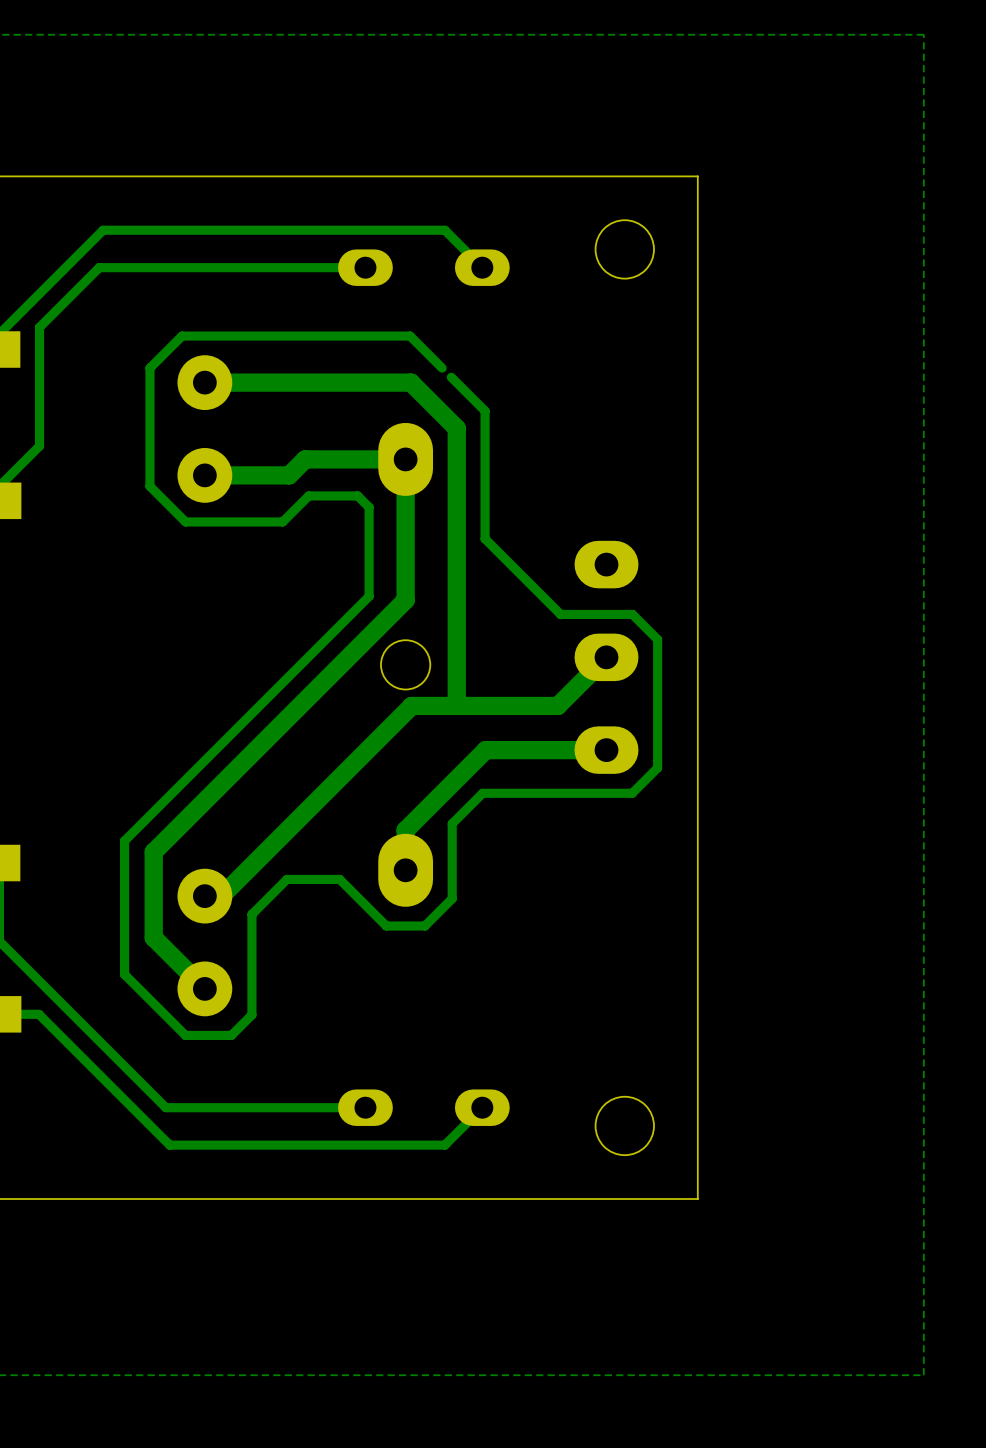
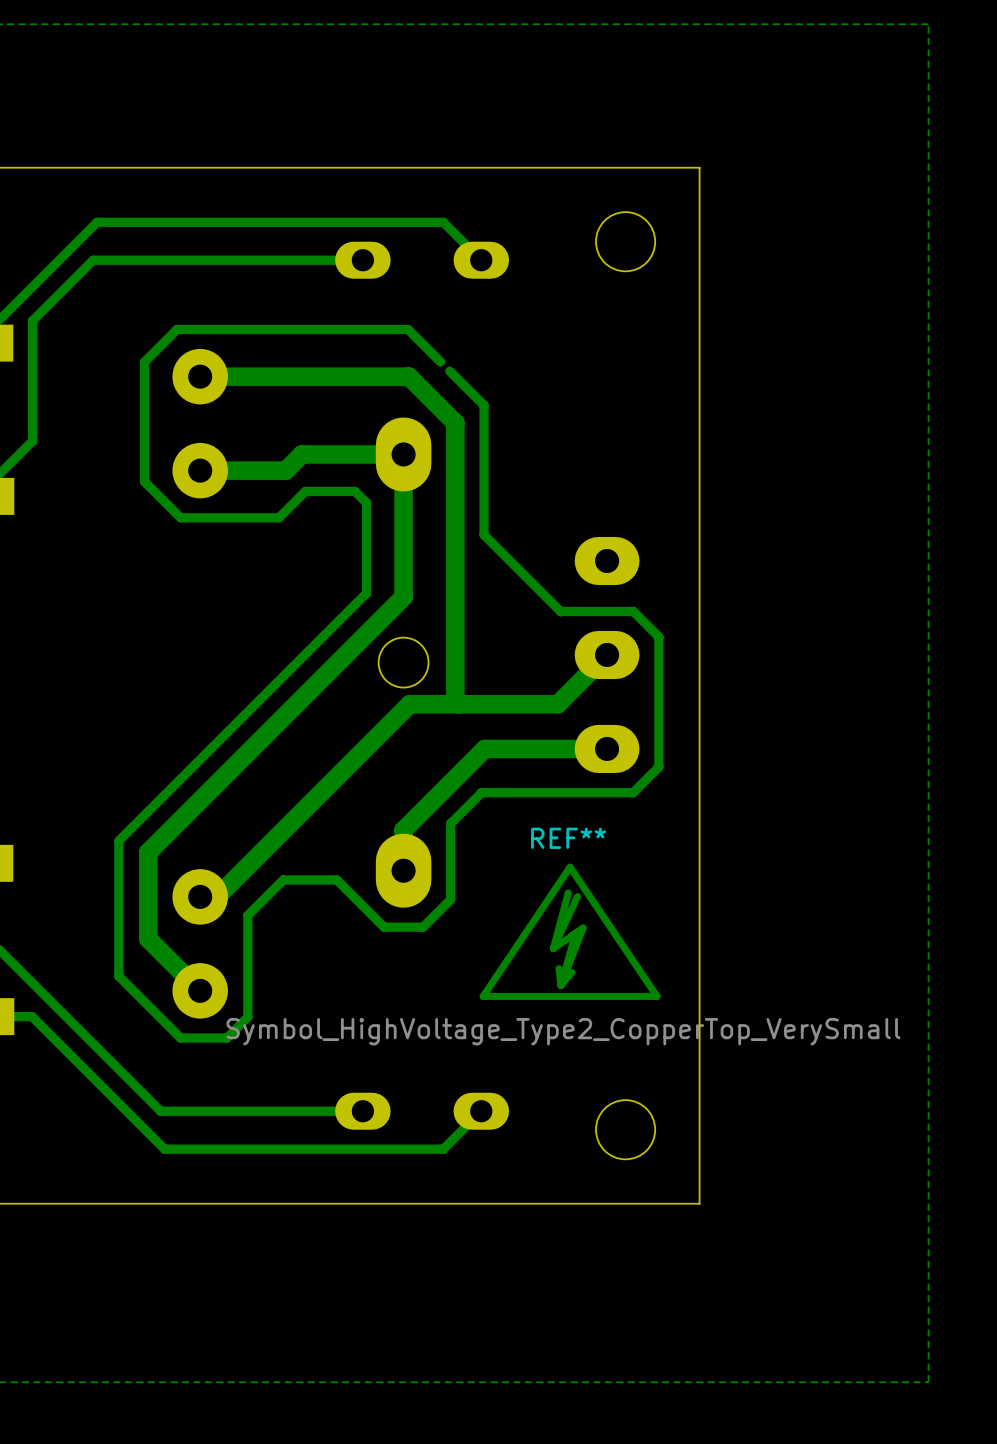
REF**: none -> Symbol_HighVoltage_Type2_CopperTop_VerySmall (570, 931)

